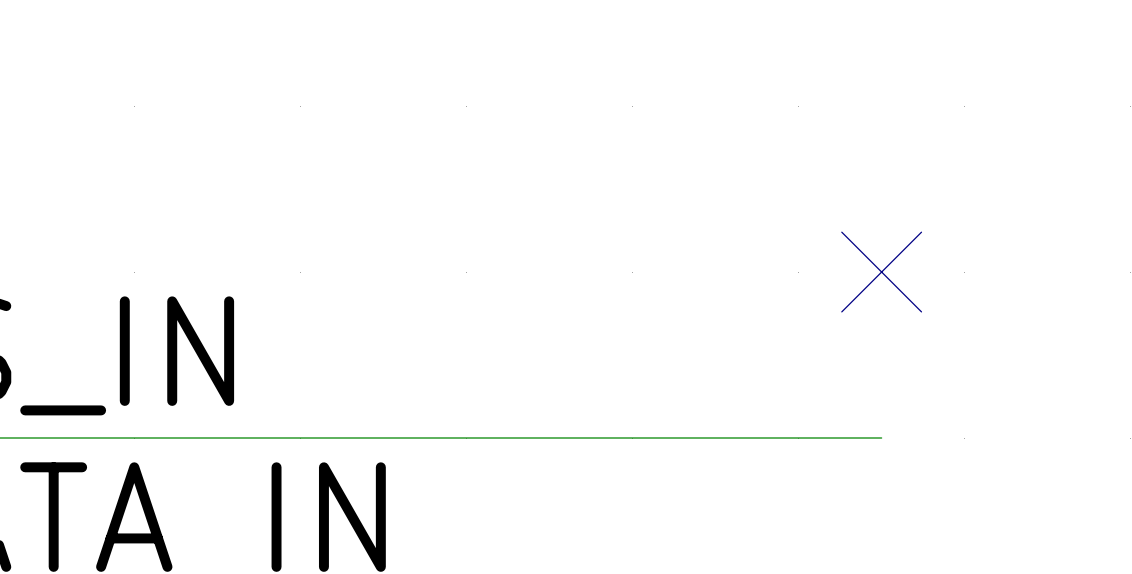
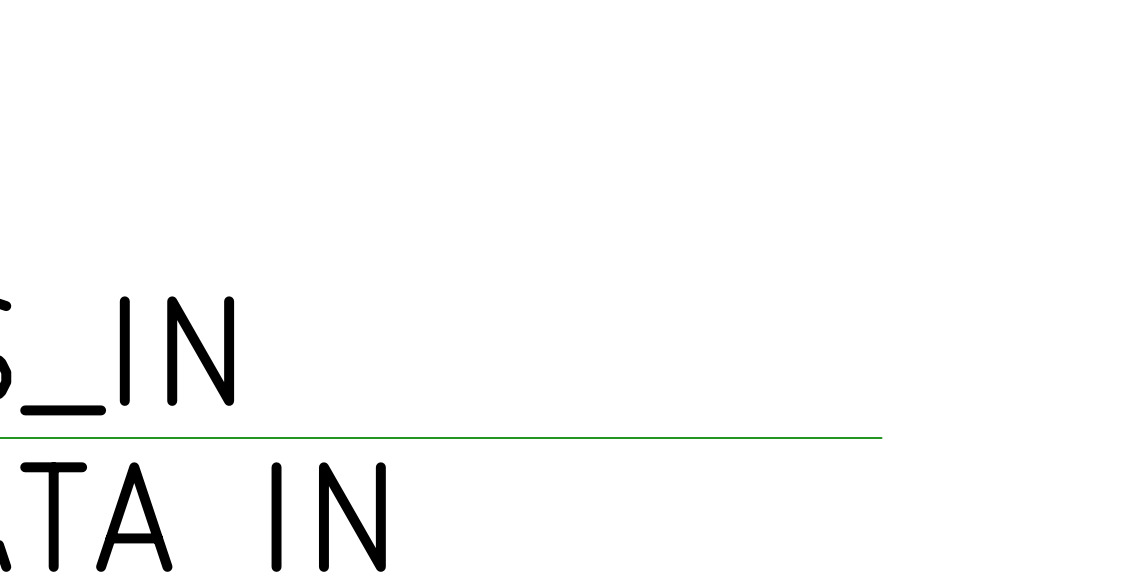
no-connect mark: (881, 272) -> none

